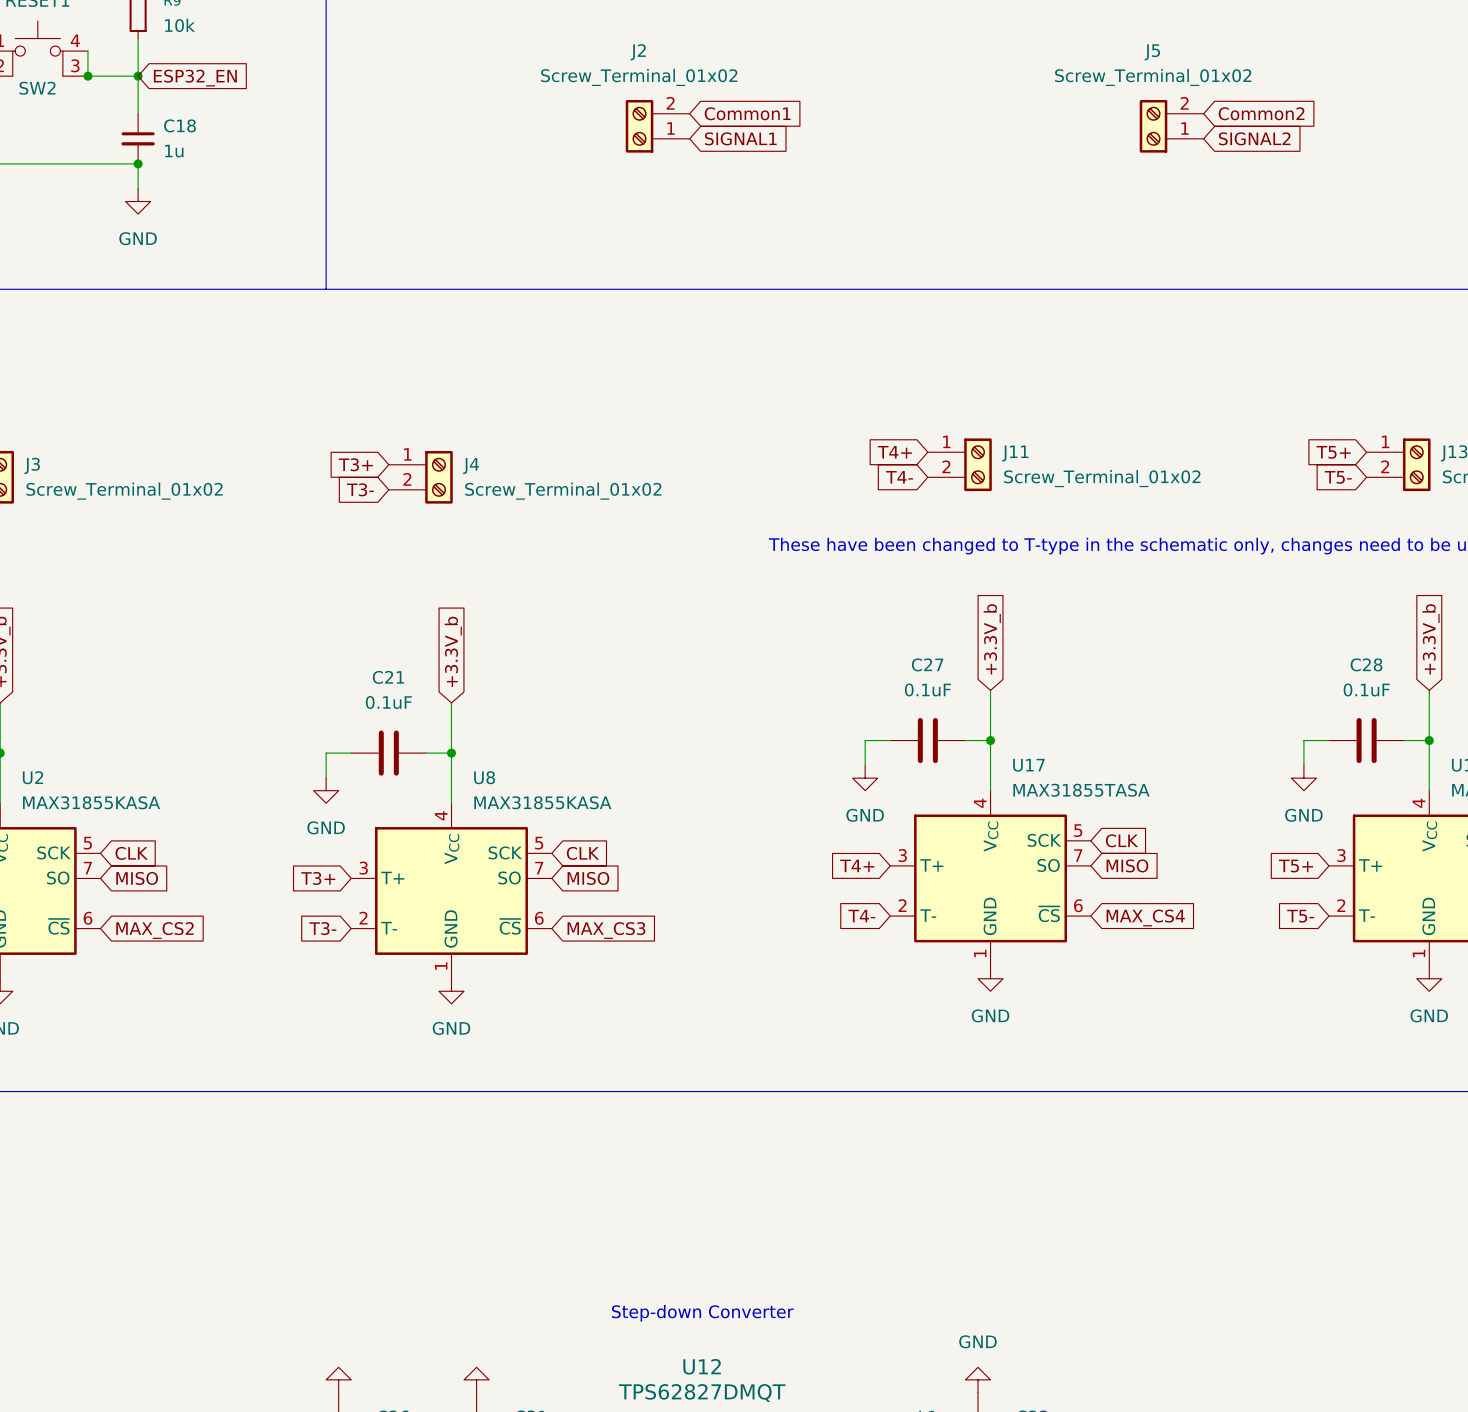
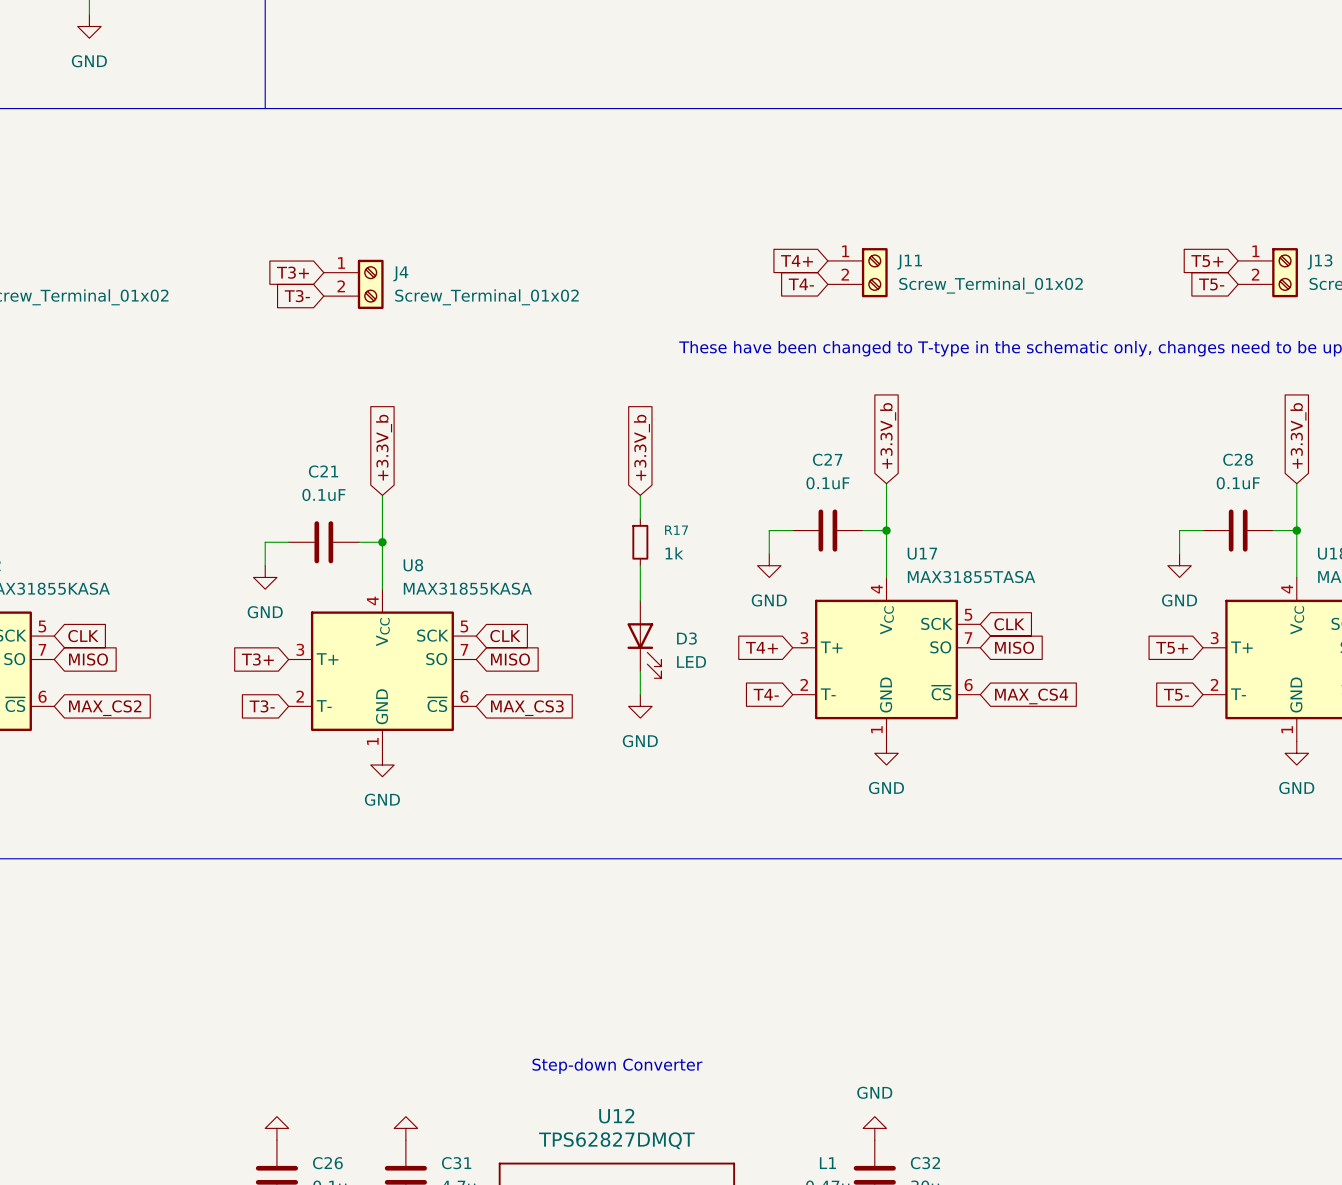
global label: none -> +3.3V_b (641, 447)
wire: none -> (640, 495) (640, 518)
R17: none -> 1k (640, 542)
wire: none -> (640, 565) (640, 600)
D3: none -> LED (644, 639)
wire: none -> (640, 671) (640, 694)
power symbol: none -> GND (640, 706)

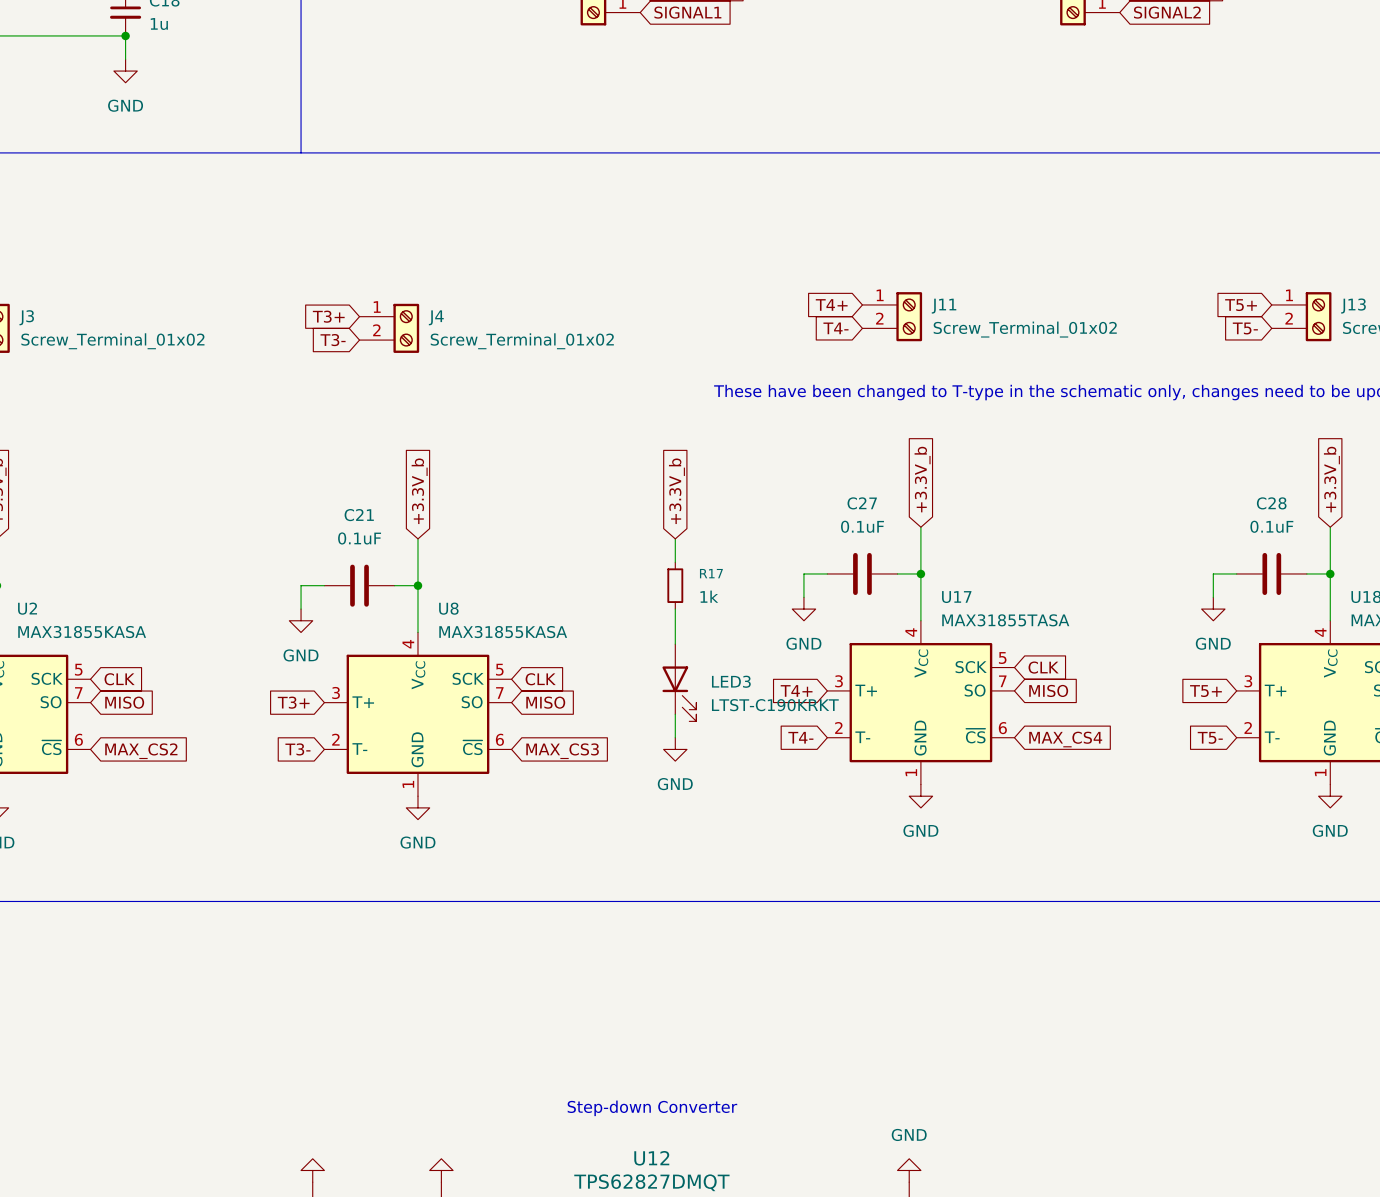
D3 name: D3 (686, 638) -> LED3 (731, 681)
D3 value: LED (691, 661) -> LTST-C190KRKT (775, 705)

